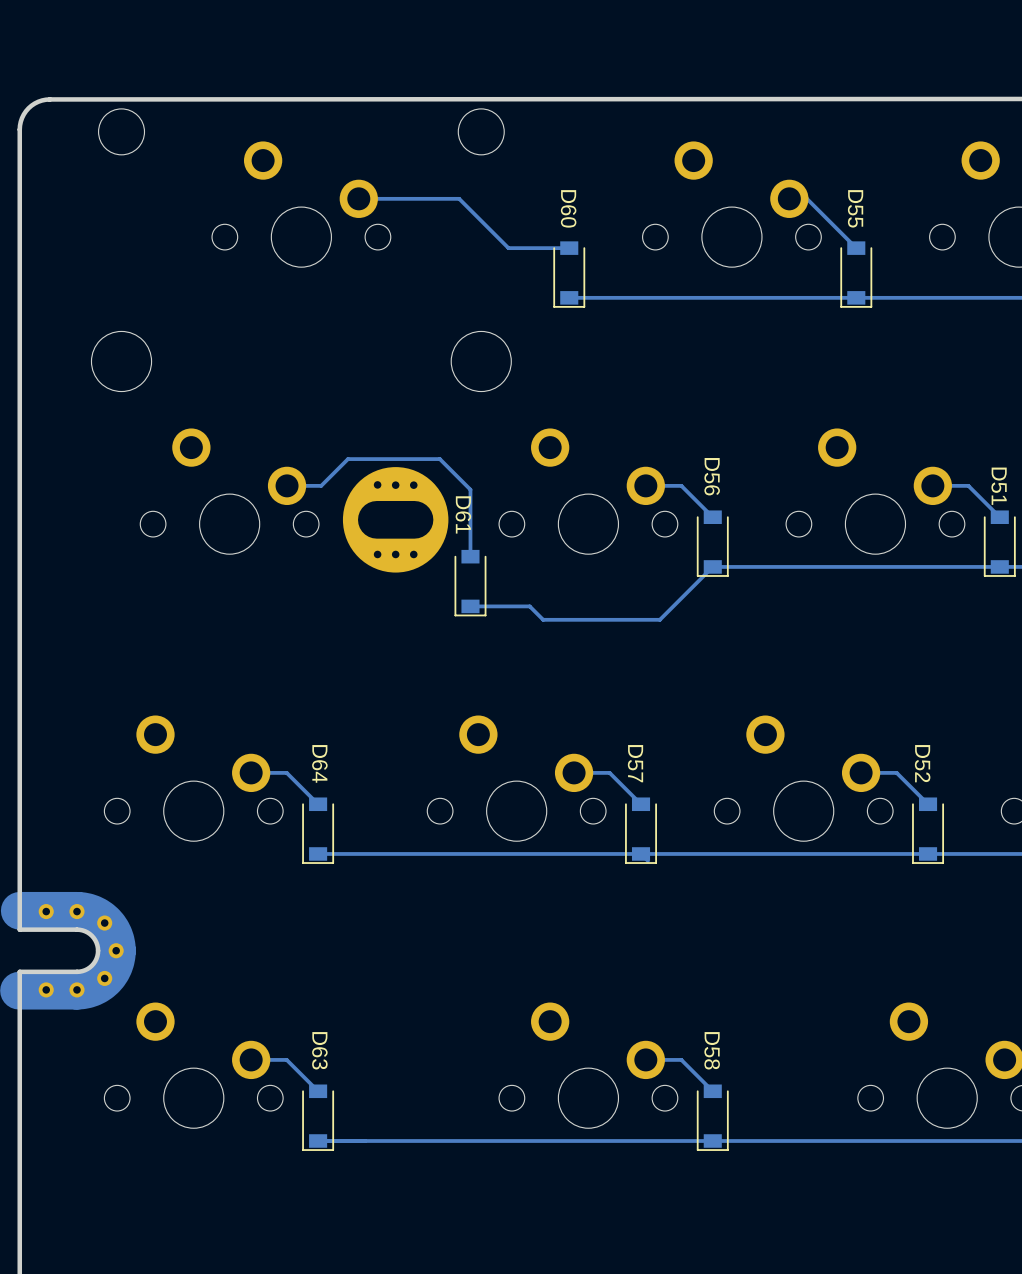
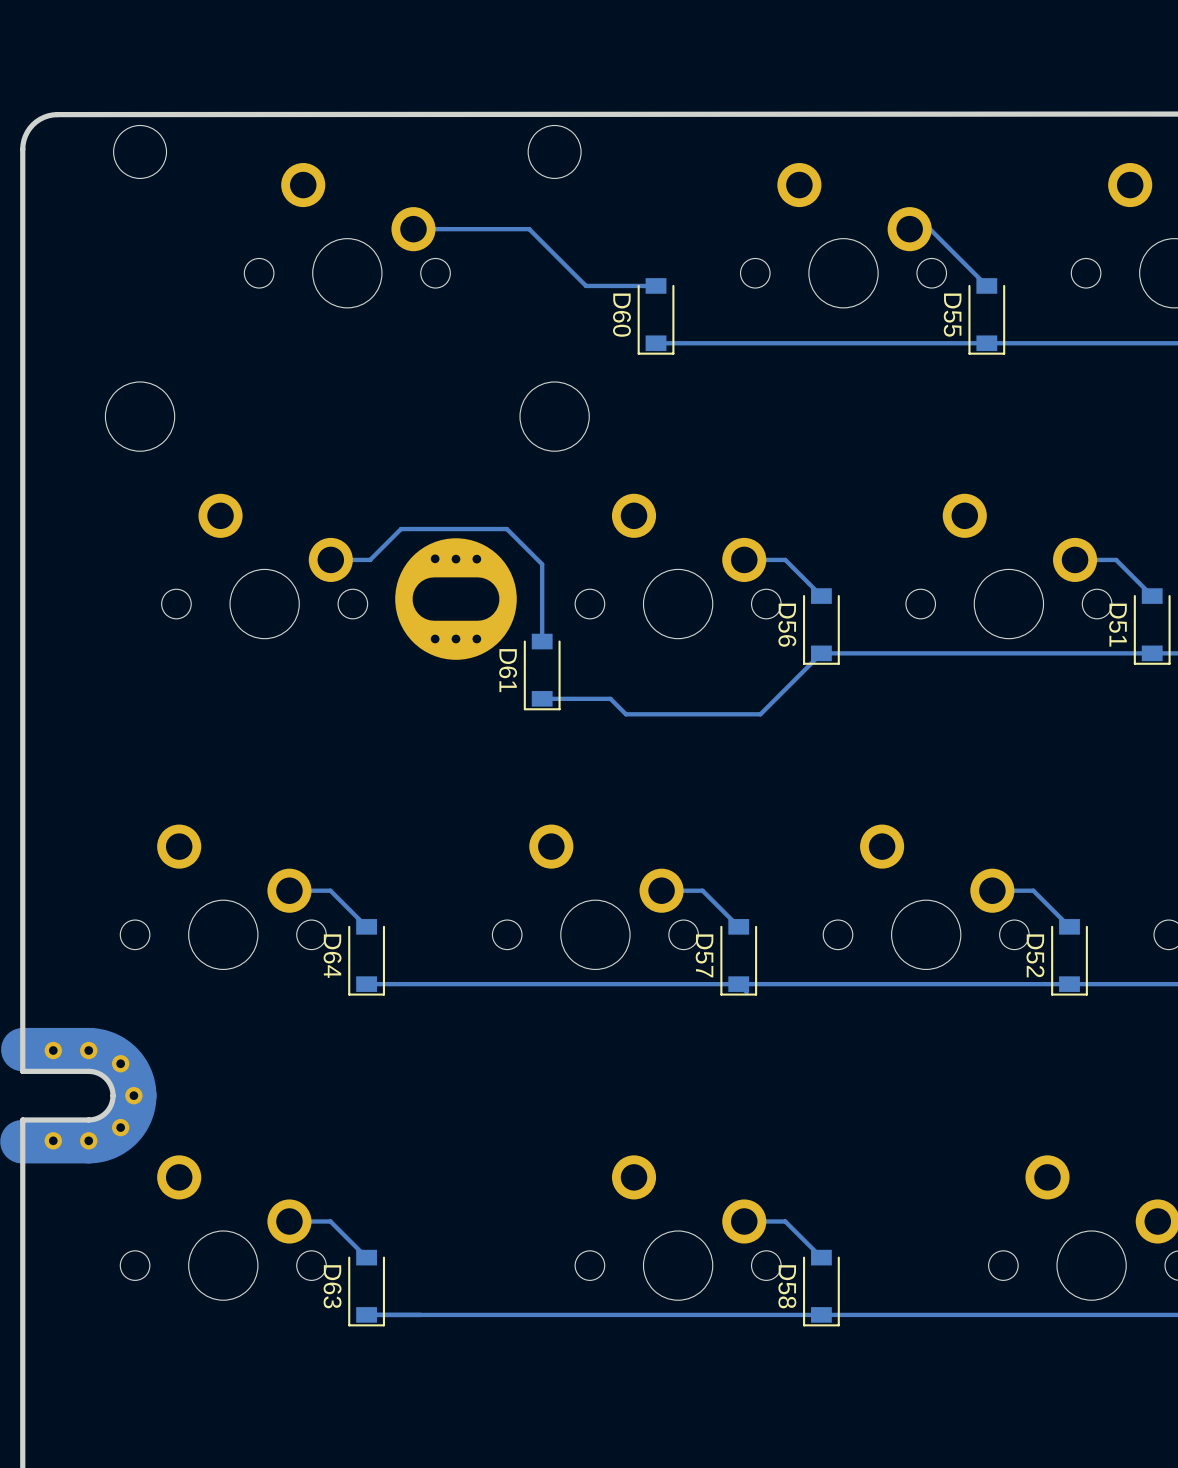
D60 name position: D60 (568, 208) -> D60 (621, 315)
D55 name position: D55 (855, 208) -> D55 (952, 315)
D56 name position: D56 (712, 476) -> D56 (787, 625)
D51 name position: D51 (999, 486) -> D51 (1118, 625)
D61 name position: D61 (463, 514) -> D61 (508, 670)
D64 name position: D64 (319, 763) -> D64 (332, 956)
D57 name position: D57 (635, 763) -> D57 (704, 955)
D52 name position: D52 (922, 763) -> D52 (1035, 955)
D63 name position: D63 (319, 1050) -> D63 (332, 1286)
D58 name position: D58 (712, 1050) -> D58 (787, 1286)

